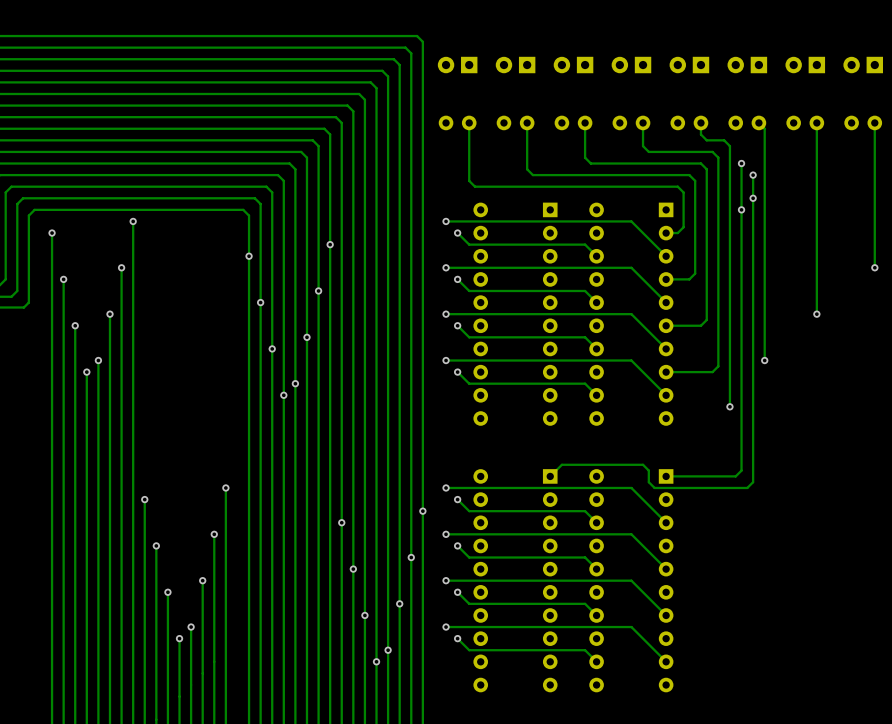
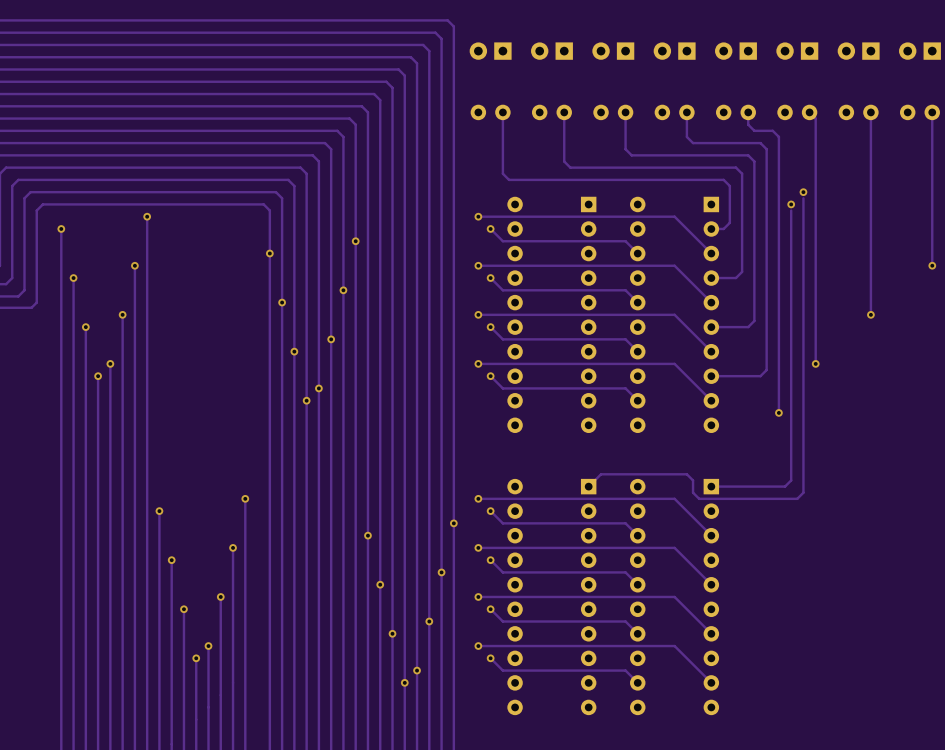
track: (741, 163) (741, 215) -> none
via: (741, 163) -> none
track: (753, 175) (753, 204) -> none
via: (753, 175) -> none

